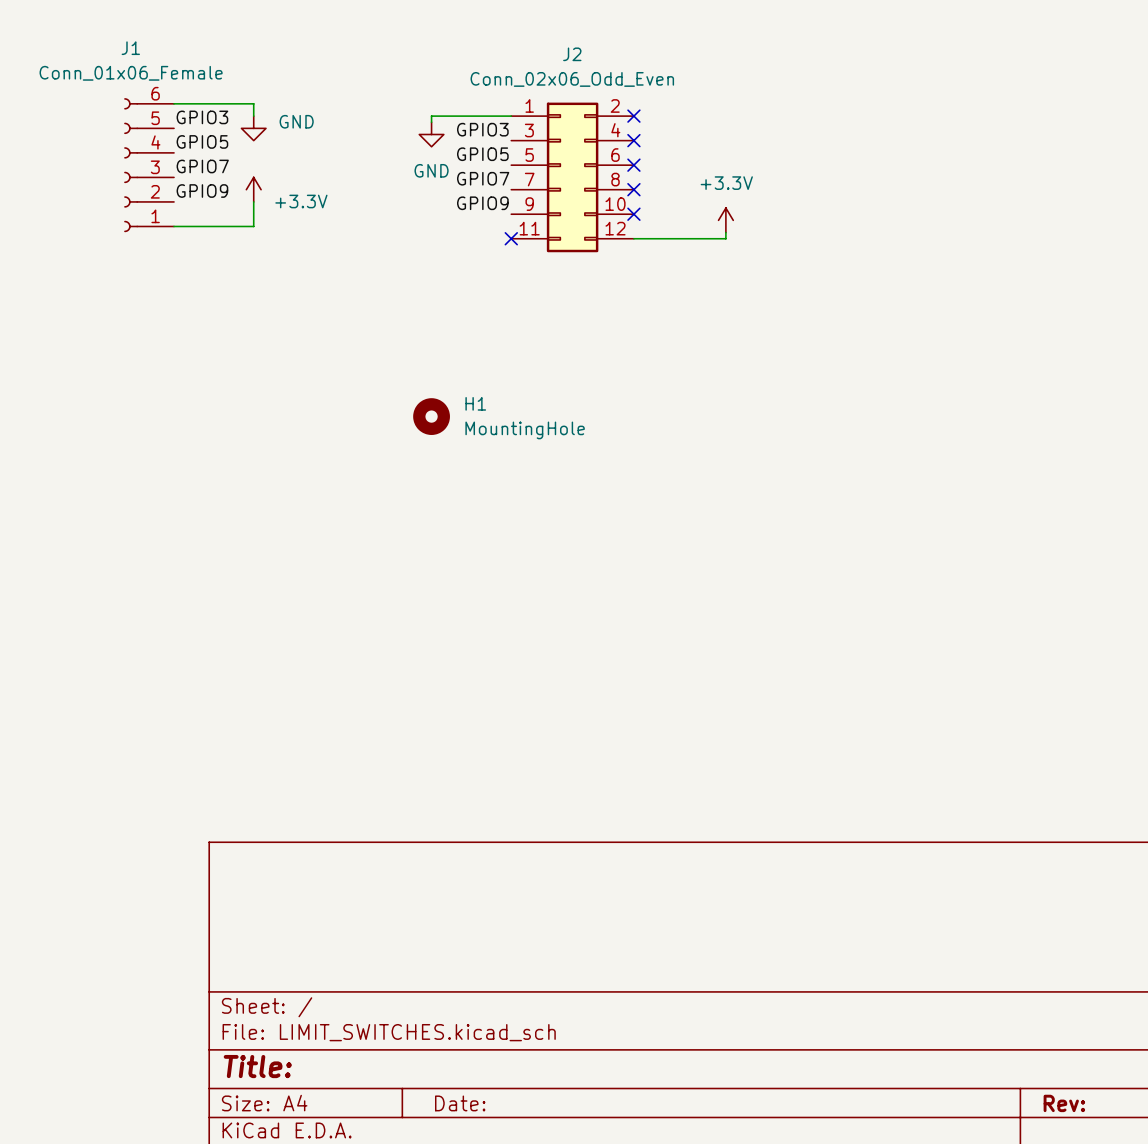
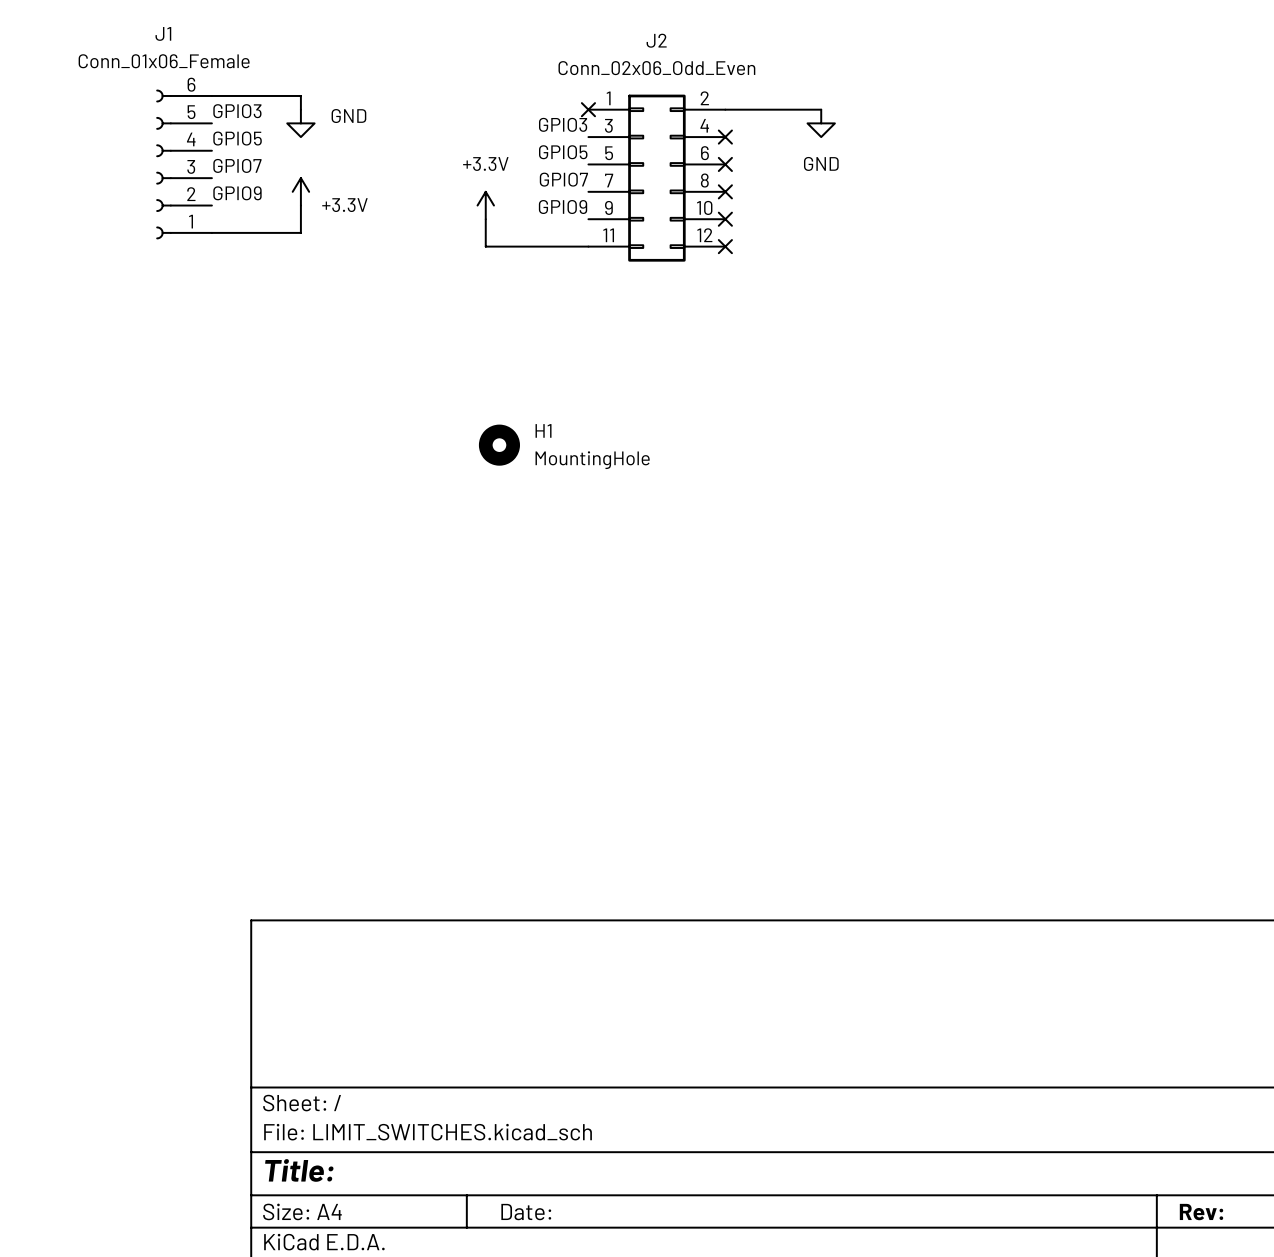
wire: (511, 116) (431, 116) (431, 122) -> none
no-connect mark: none -> (588, 109)
wire: none -> (725, 109) (821, 109)
no-connect mark: (633, 116) -> none
power symbol: none -> GND (821, 123)
power symbol: GND (431, 134) -> none
power symbol: none -> +3.3V (485, 205)
wire: none -> (485, 219) (485, 246) (588, 246)
power symbol: +3.3V (725, 220) -> none
wire: (725, 232) (725, 238) (633, 238) -> none
no-connect mark: (511, 238) -> none
no-connect mark: none -> (725, 246)

